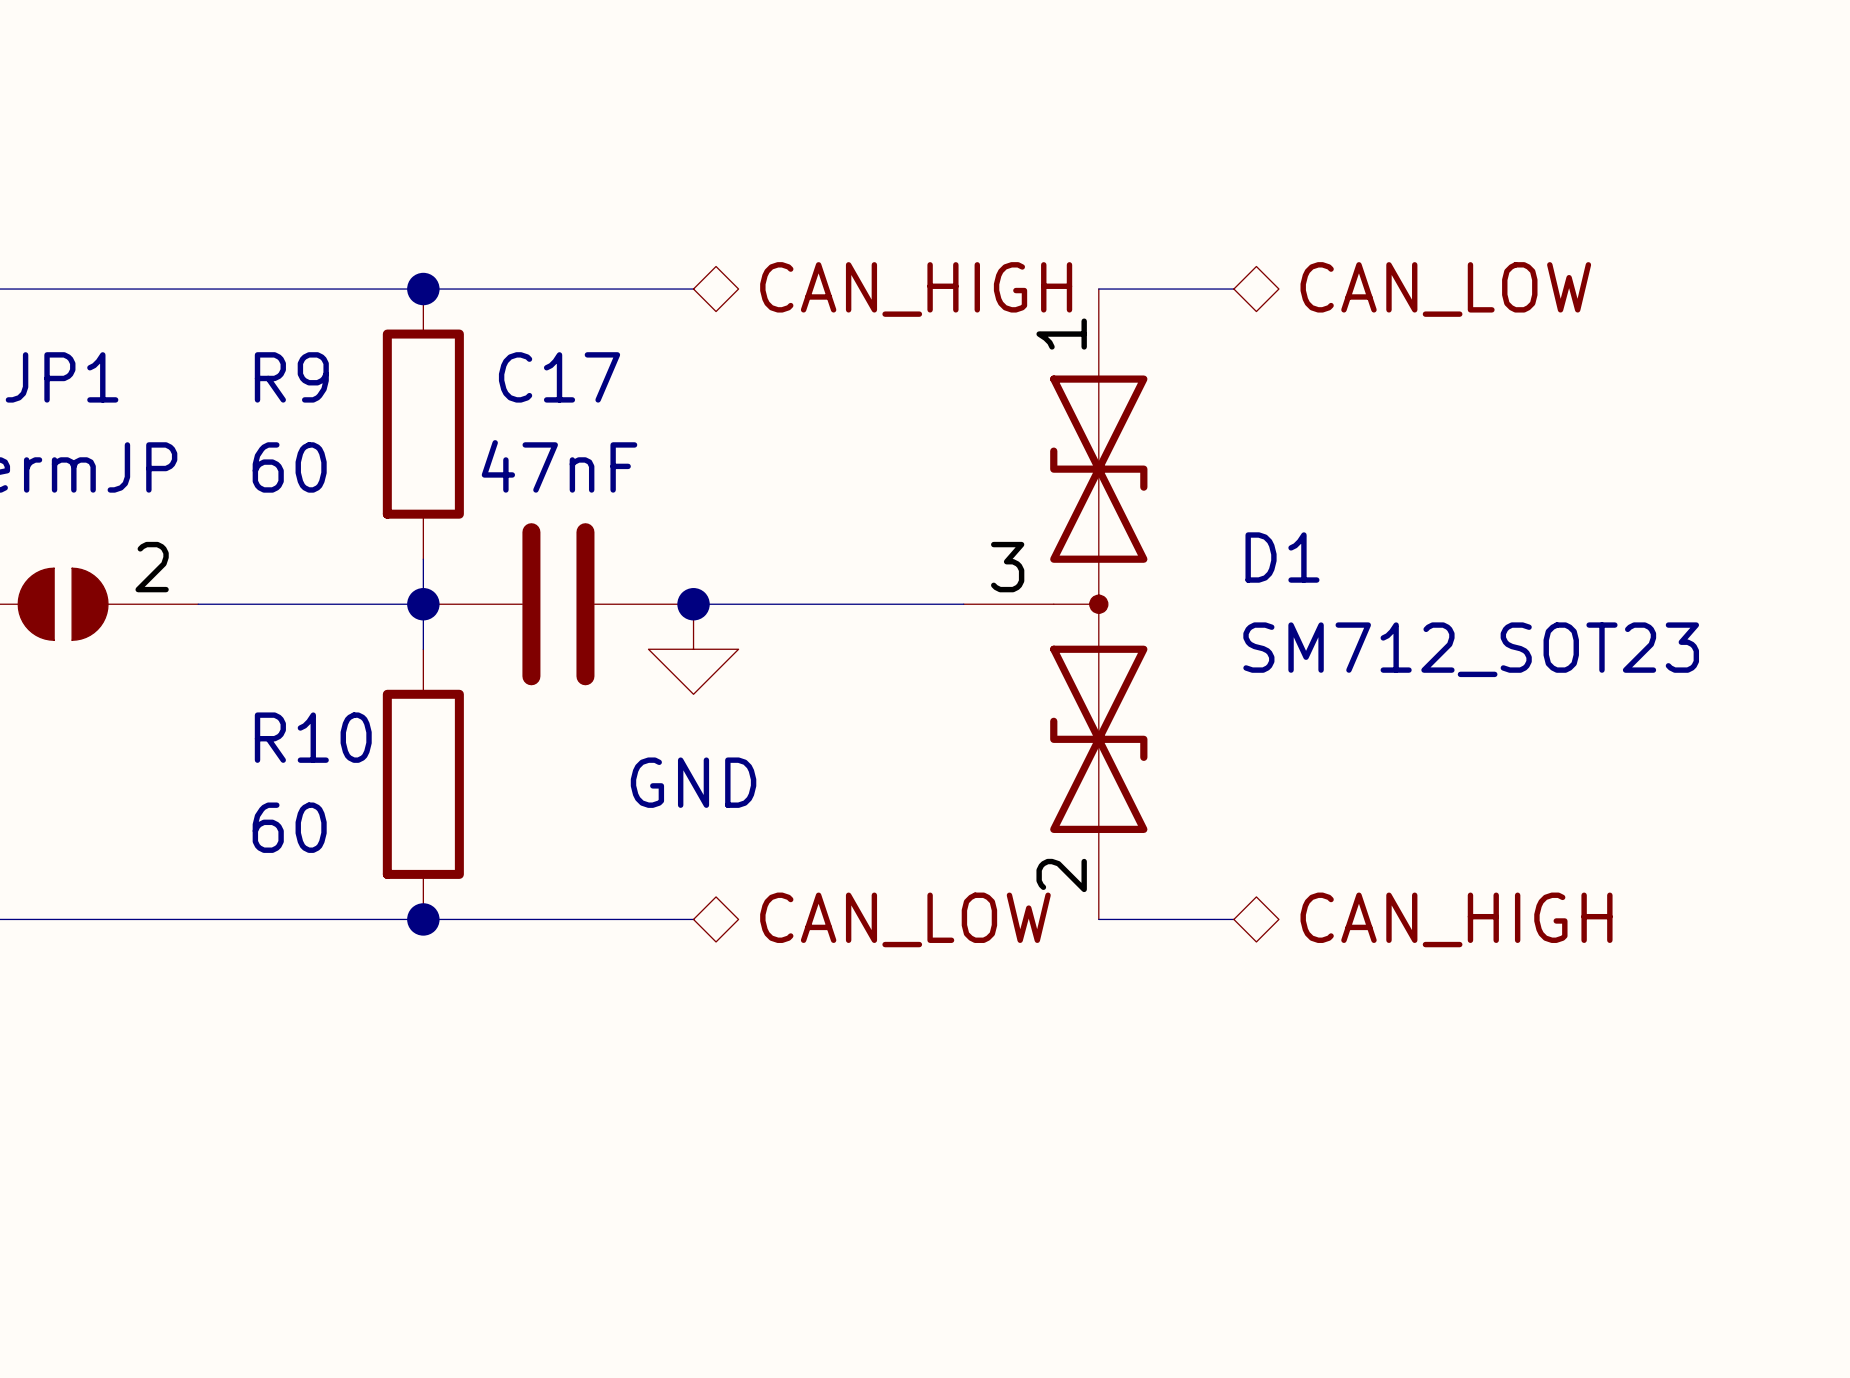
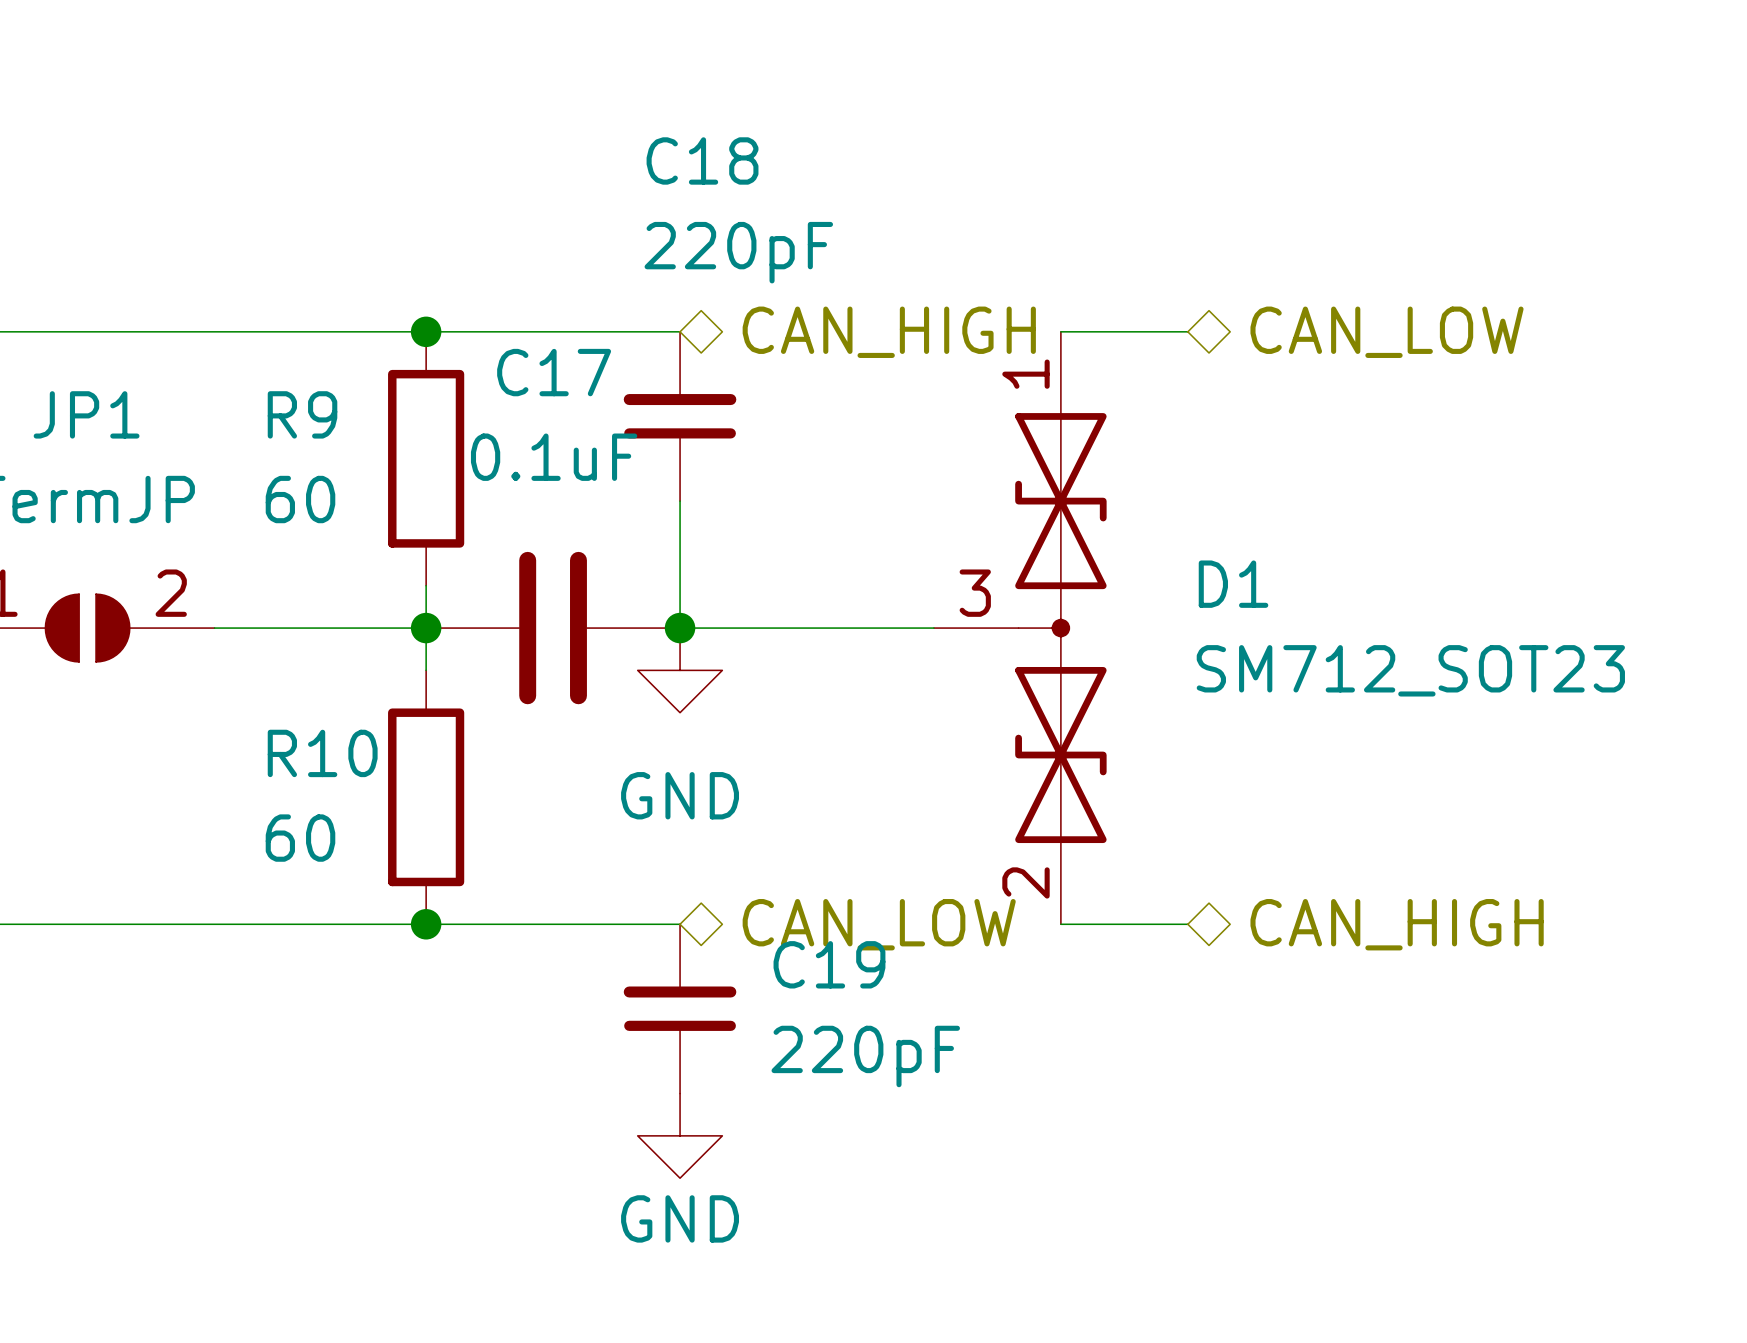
C17 name position: C17 (559, 377) -> C17 (554, 372)
C18: none -> 220pF (680, 416)
C17 value: 47nF (559, 466) -> 0.1uF (554, 457)
wire: none -> (680, 501) (680, 628)
C19: none -> 220pF (680, 1008)
power symbol: none -> GND (680, 1135)

